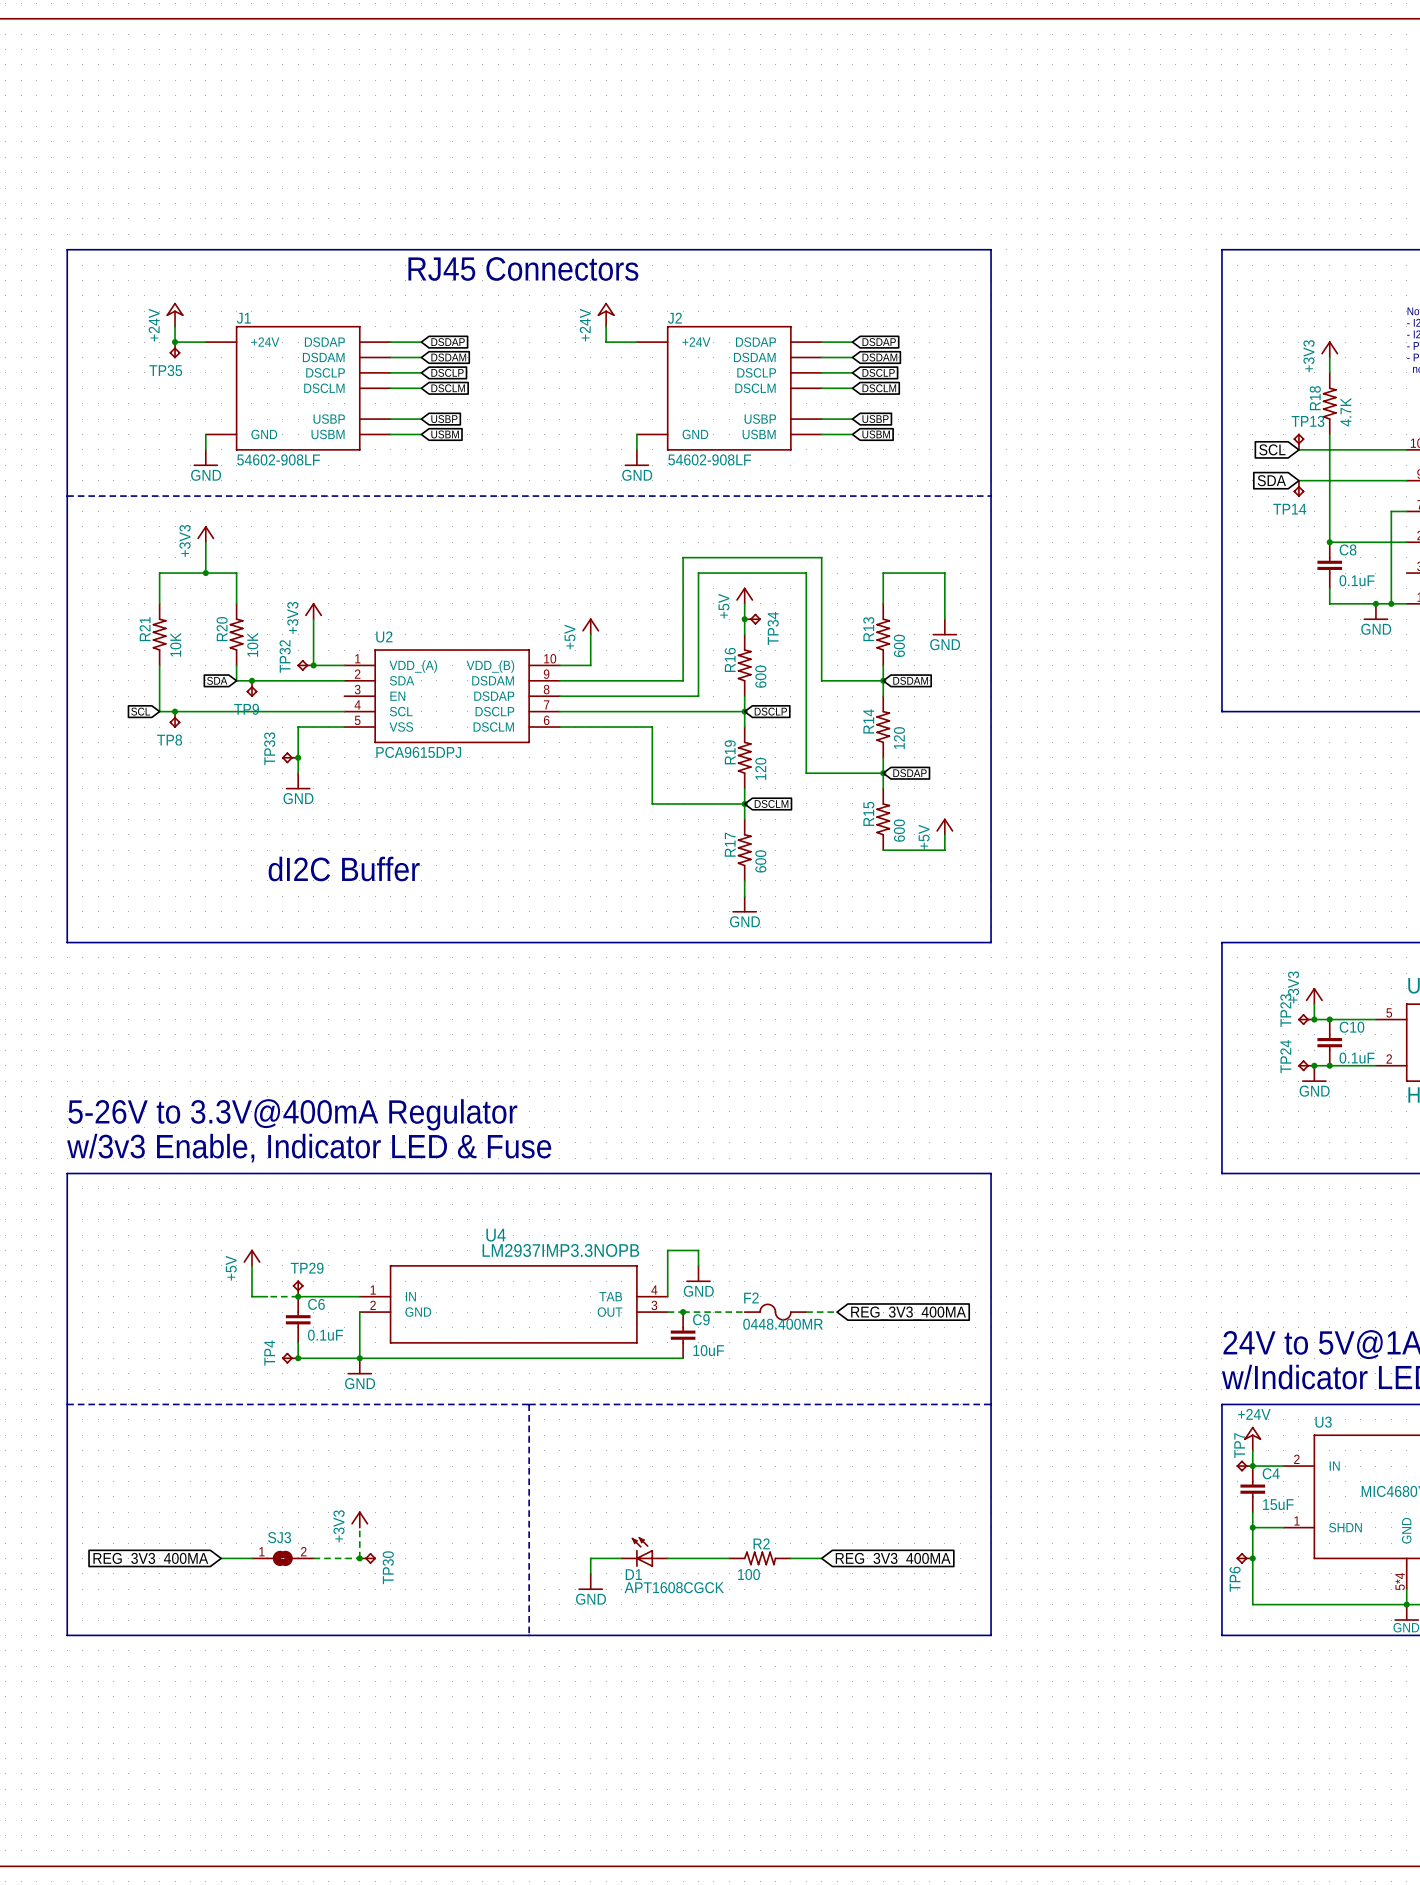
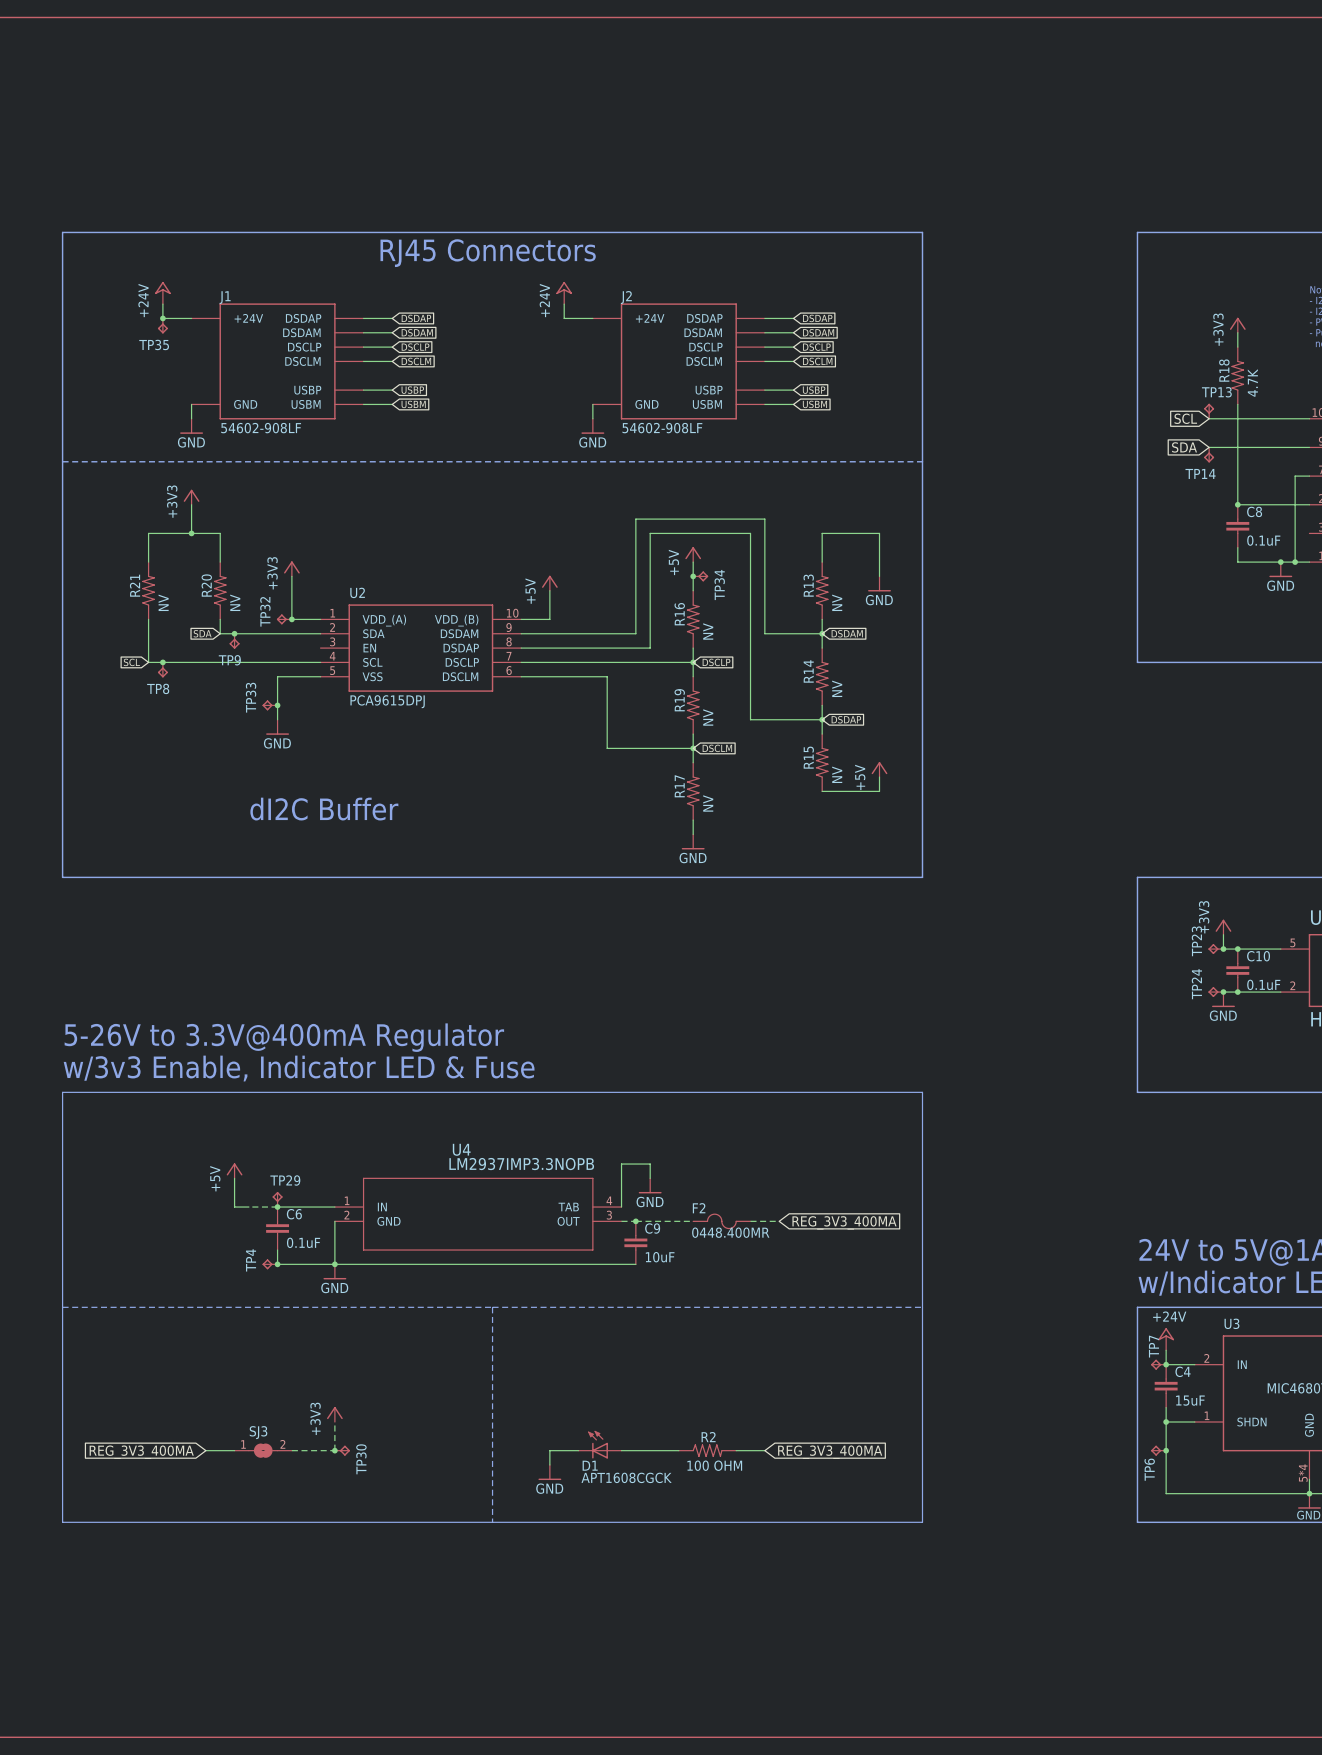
R21 value: 10K (175, 644) -> NV (163, 602)
R20 value: 10K (252, 644) -> NV (235, 602)
R13 value: 600 (899, 645) -> NV (837, 602)
R16 value: 600 (760, 676) -> NV (708, 631)
R14 value: 120 (899, 738) -> NV (837, 688)
R19 value: 120 (760, 768) -> NV (708, 717)
R15 value: 600 (899, 830) -> NV (837, 774)
R17 value: 600 (760, 861) -> NV (708, 803)
R2 value: 100 (749, 1574) -> 100 OHM (714, 1465)

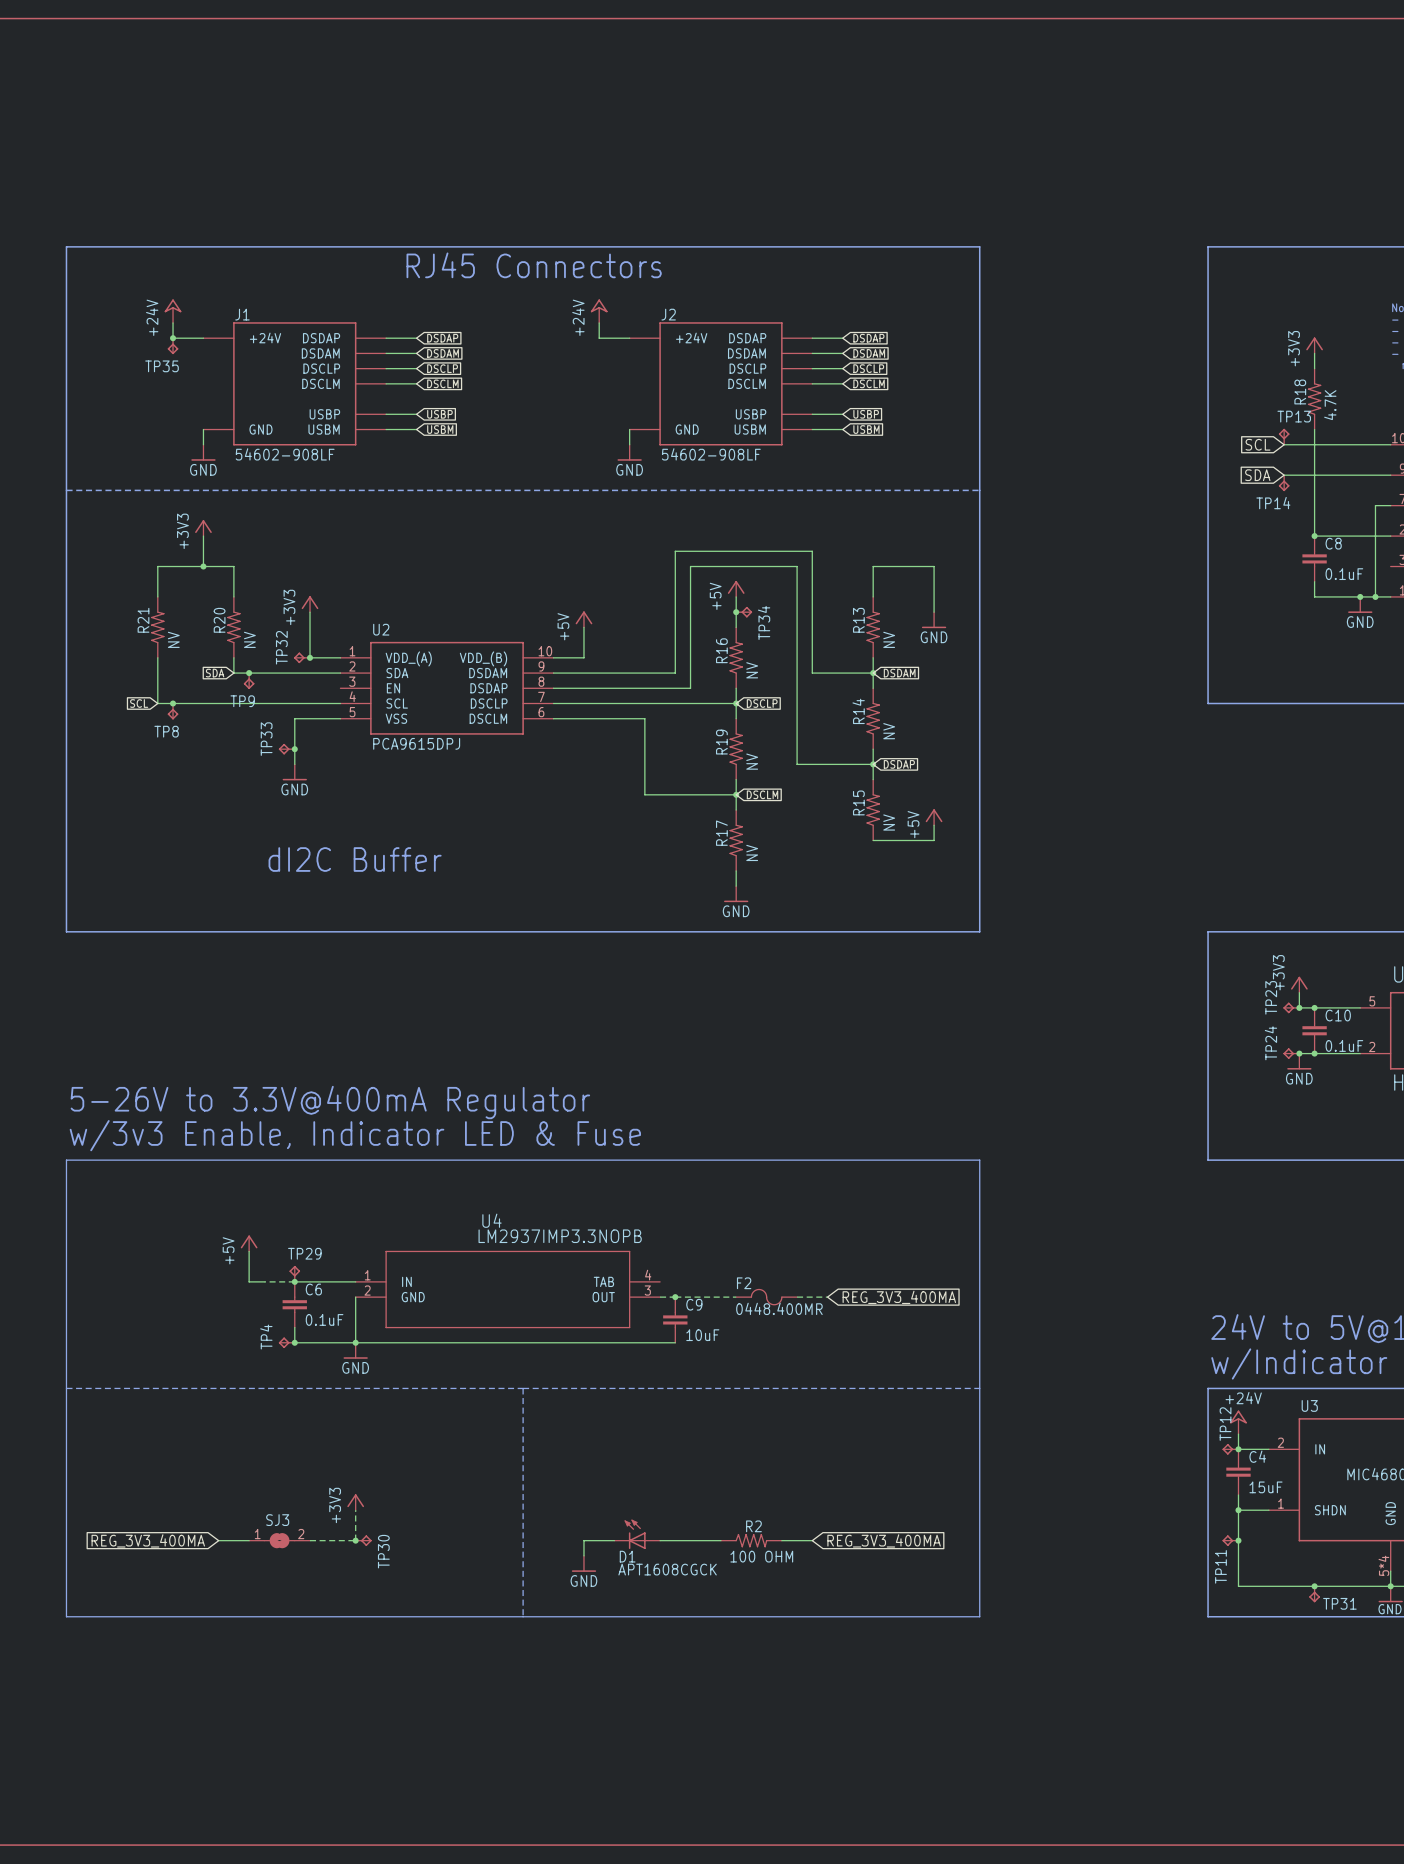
wire: (650, 1178) (650, 1164) (621, 1164) (621, 1207) -> none
power symbol: GND (650, 1185) -> none
TP7 name: TP7 (1153, 1346) -> TP12 (1225, 1424)
TP6 name: TP6 (1149, 1469) -> TP11 (1220, 1566)
junction: none -> (1314, 1586)
TP31: none -> (1314, 1594)

